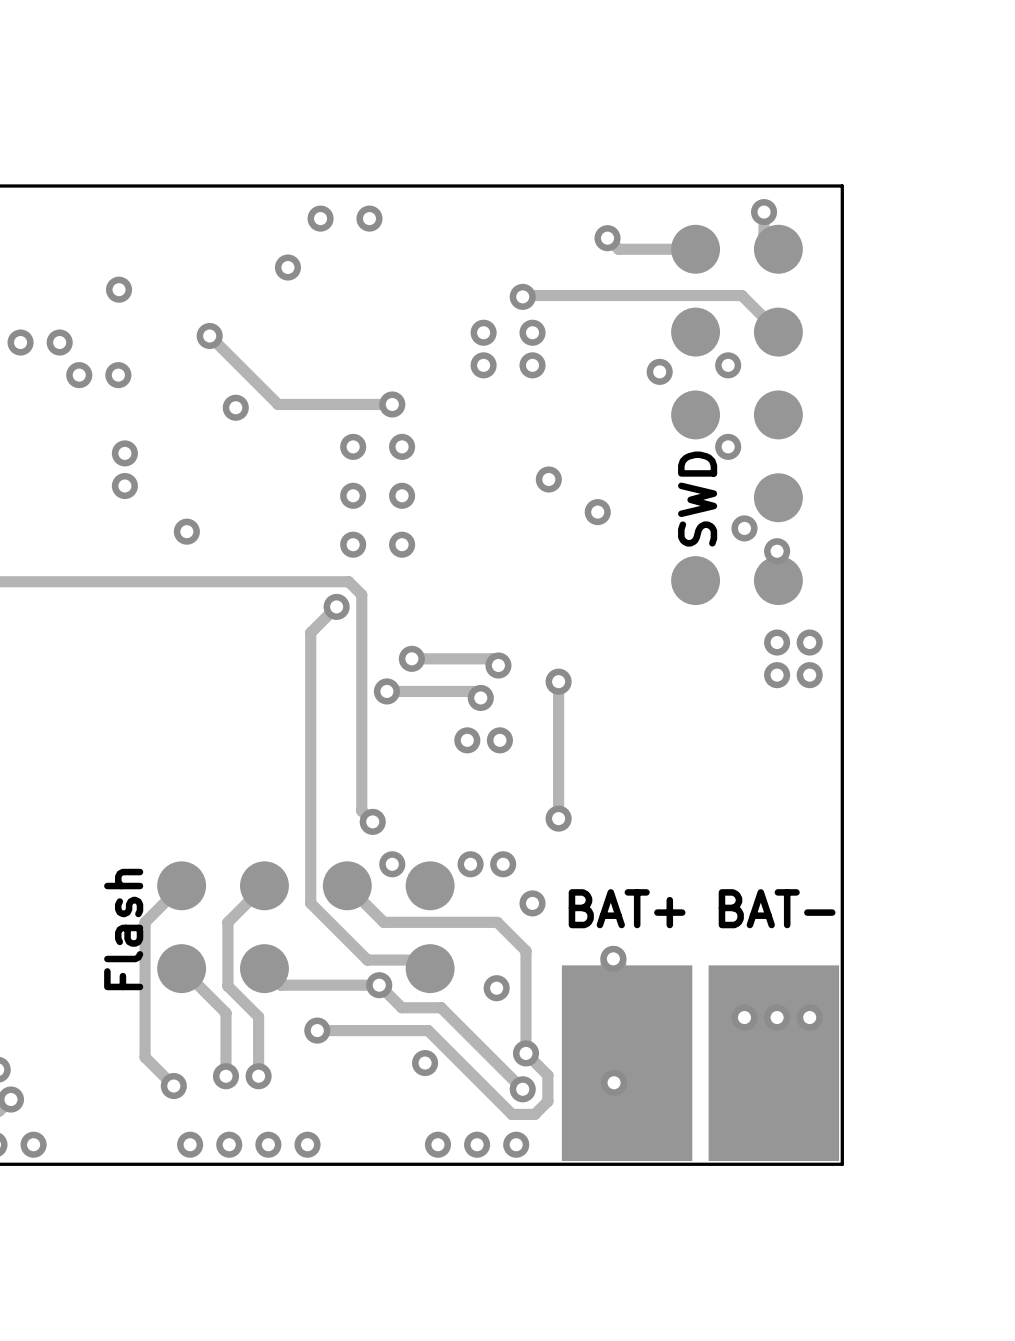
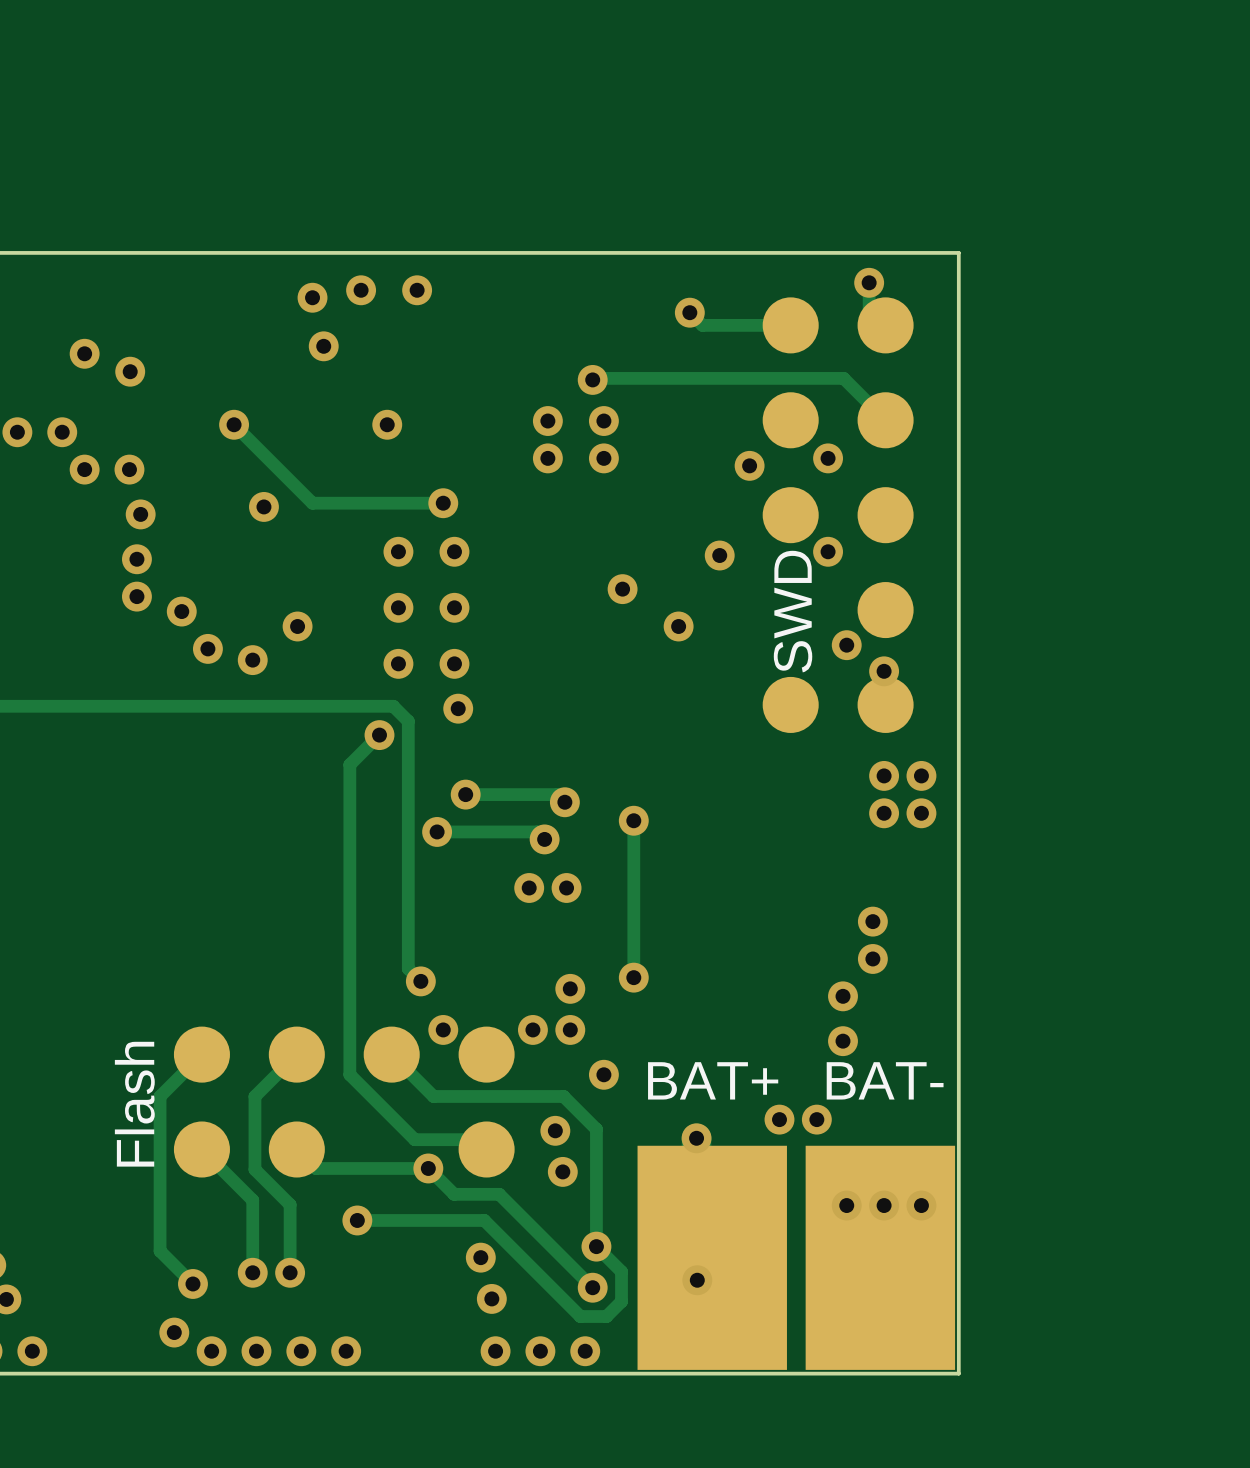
via: none -> (312, 297)
via: none -> (84, 353)
via: none -> (387, 424)
via: none -> (140, 514)
via: none -> (719, 555)
via: none -> (181, 611)
via: none -> (297, 626)
via: none -> (252, 660)
via: none -> (458, 708)
via: none -> (872, 921)
via: none -> (872, 958)
via: none -> (570, 988)
via: none -> (843, 996)
via: none -> (843, 1041)
via: none -> (779, 1119)
via: none -> (816, 1119)
via: none -> (555, 1130)
via: none -> (491, 1298)
via: none -> (174, 1332)

